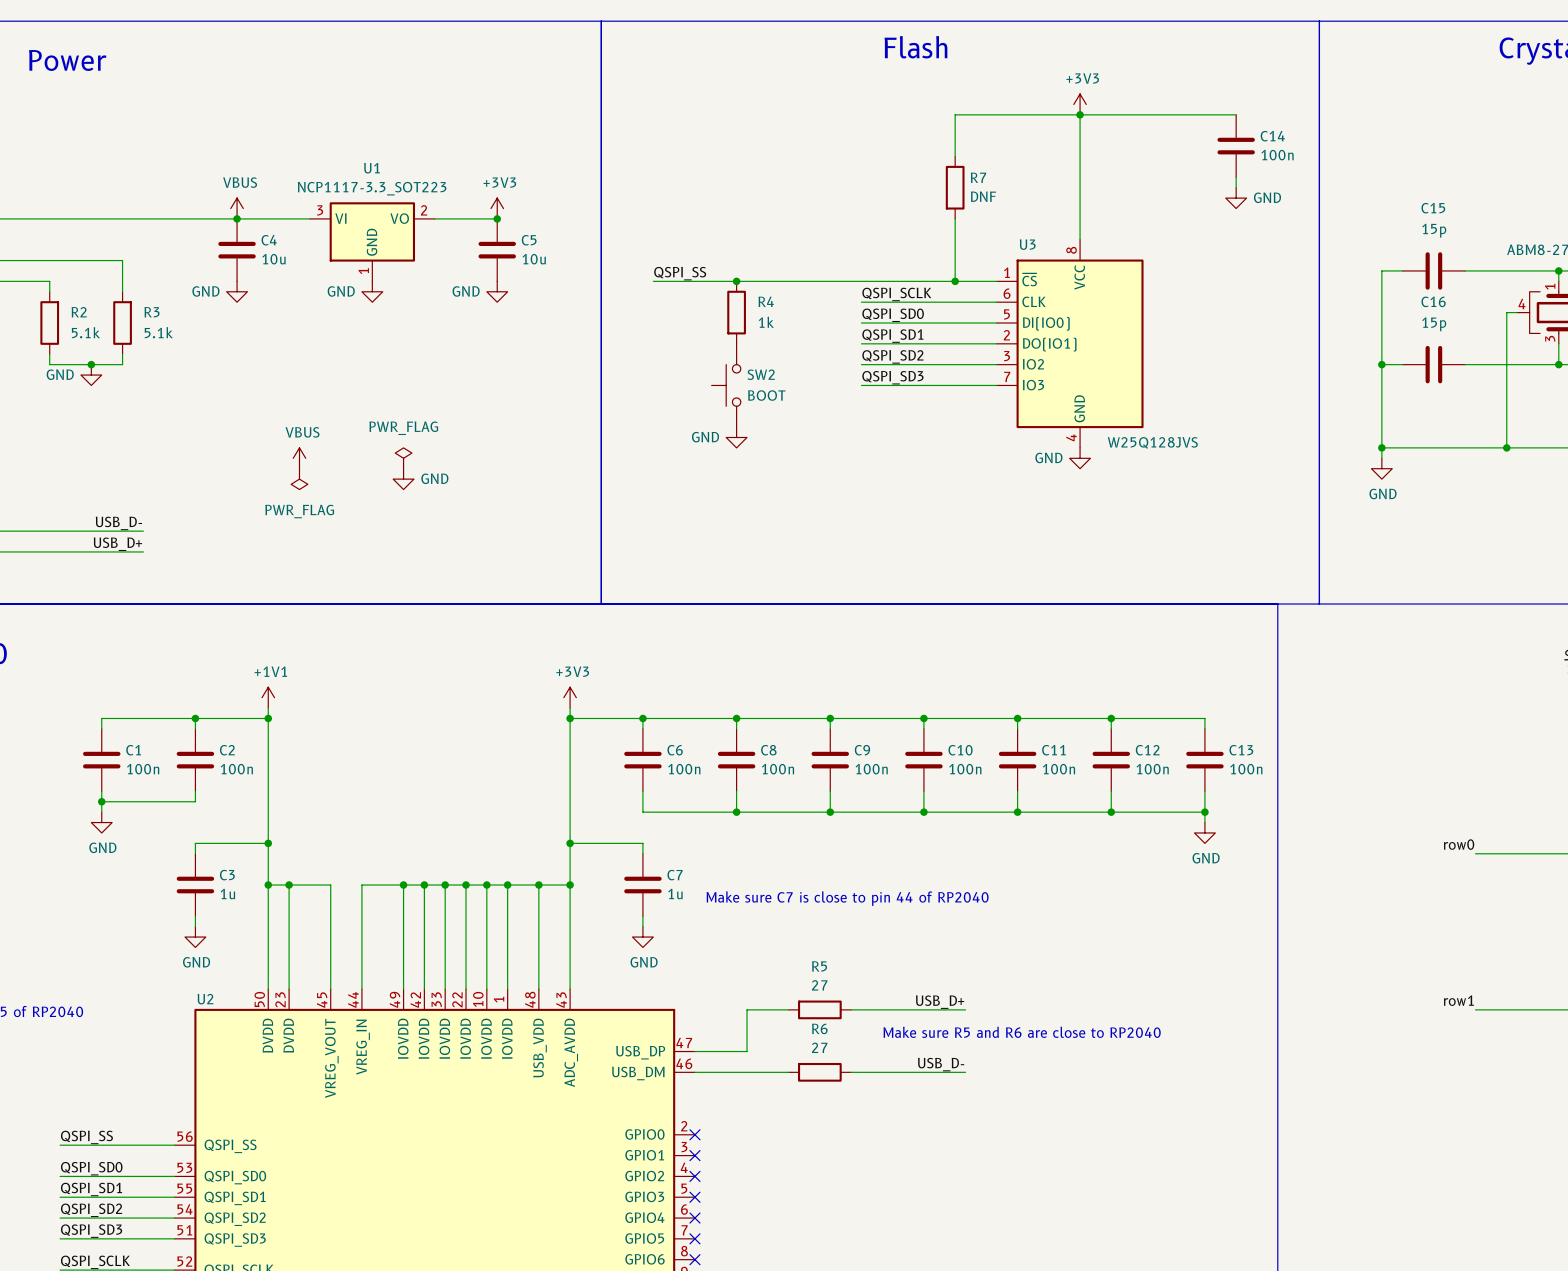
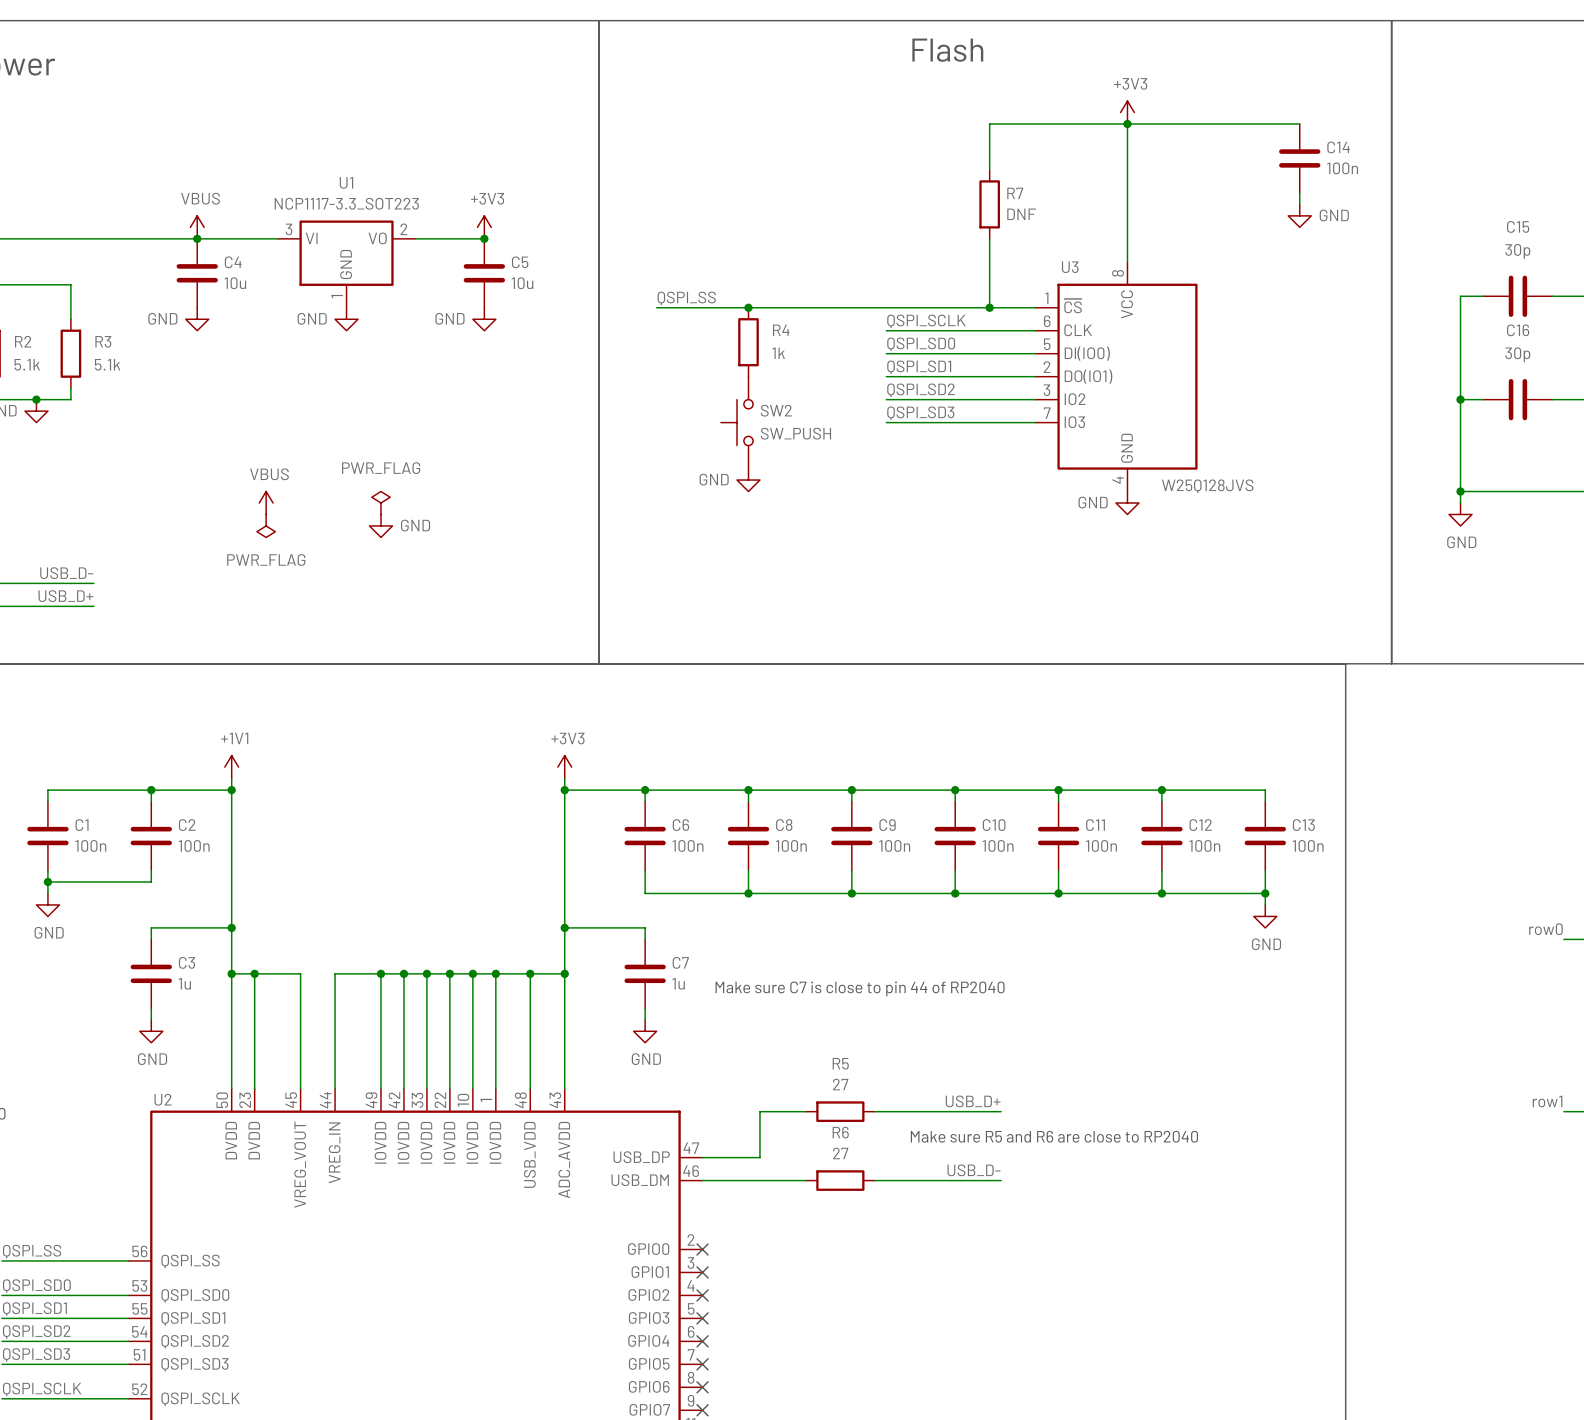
C15 value: 15p (1434, 230) -> 30p (1517, 251)
C16 value: 15p (1434, 324) -> 30p (1517, 354)
SW2 value: BOOT (766, 395) -> SW_PUSH (795, 433)

